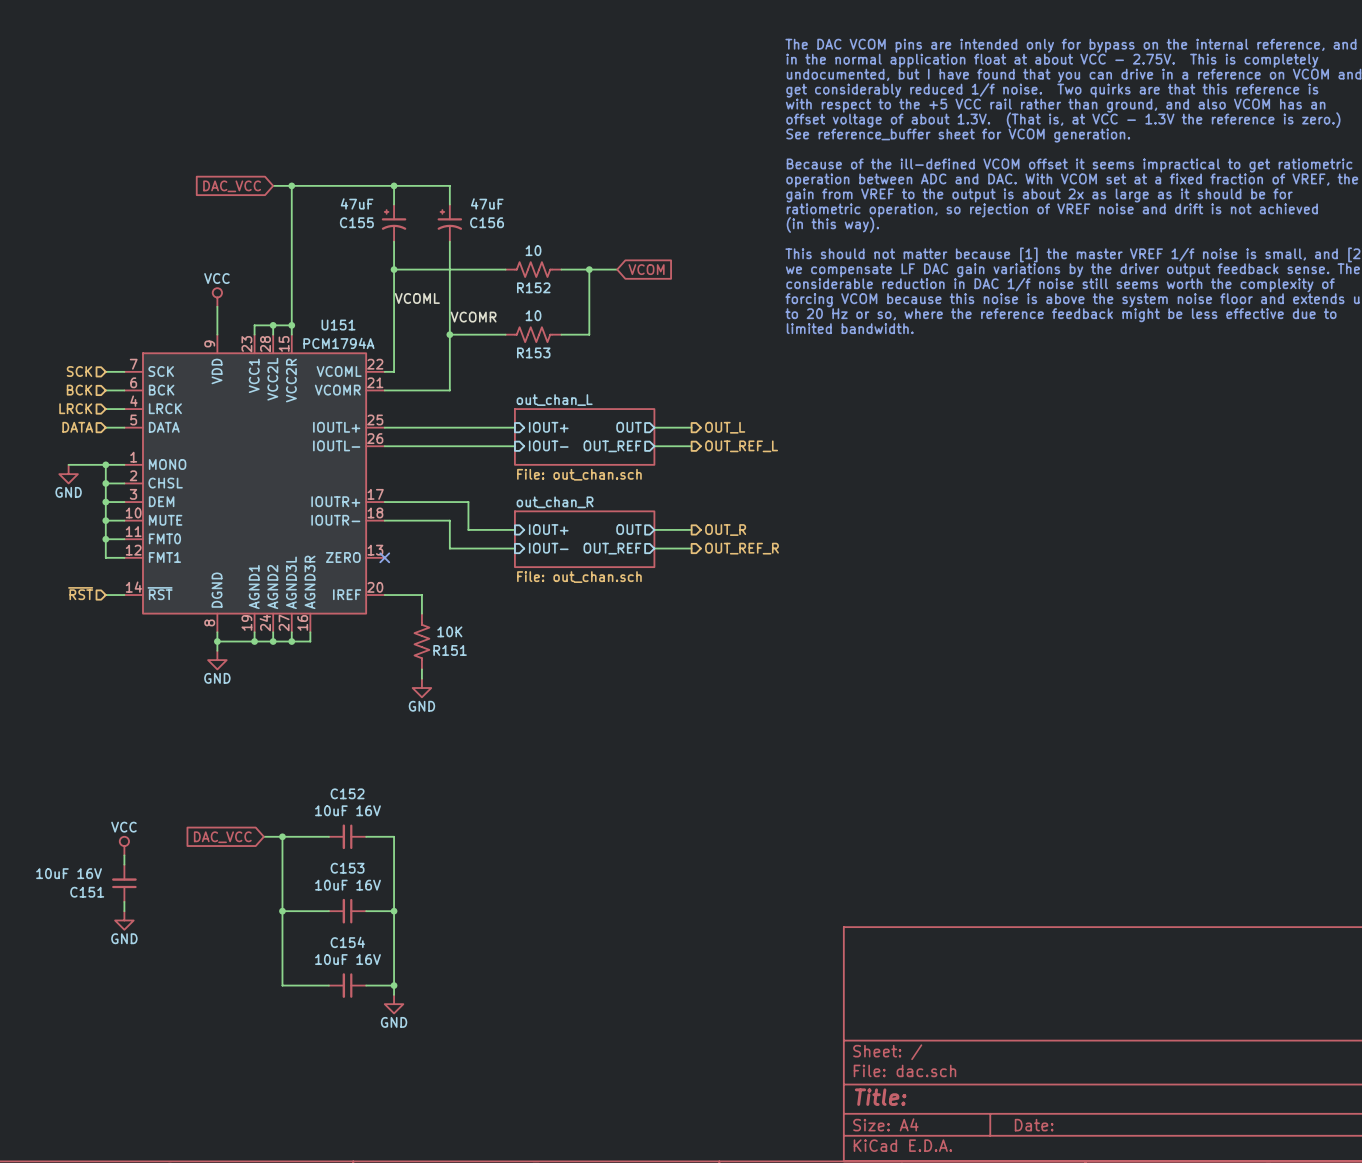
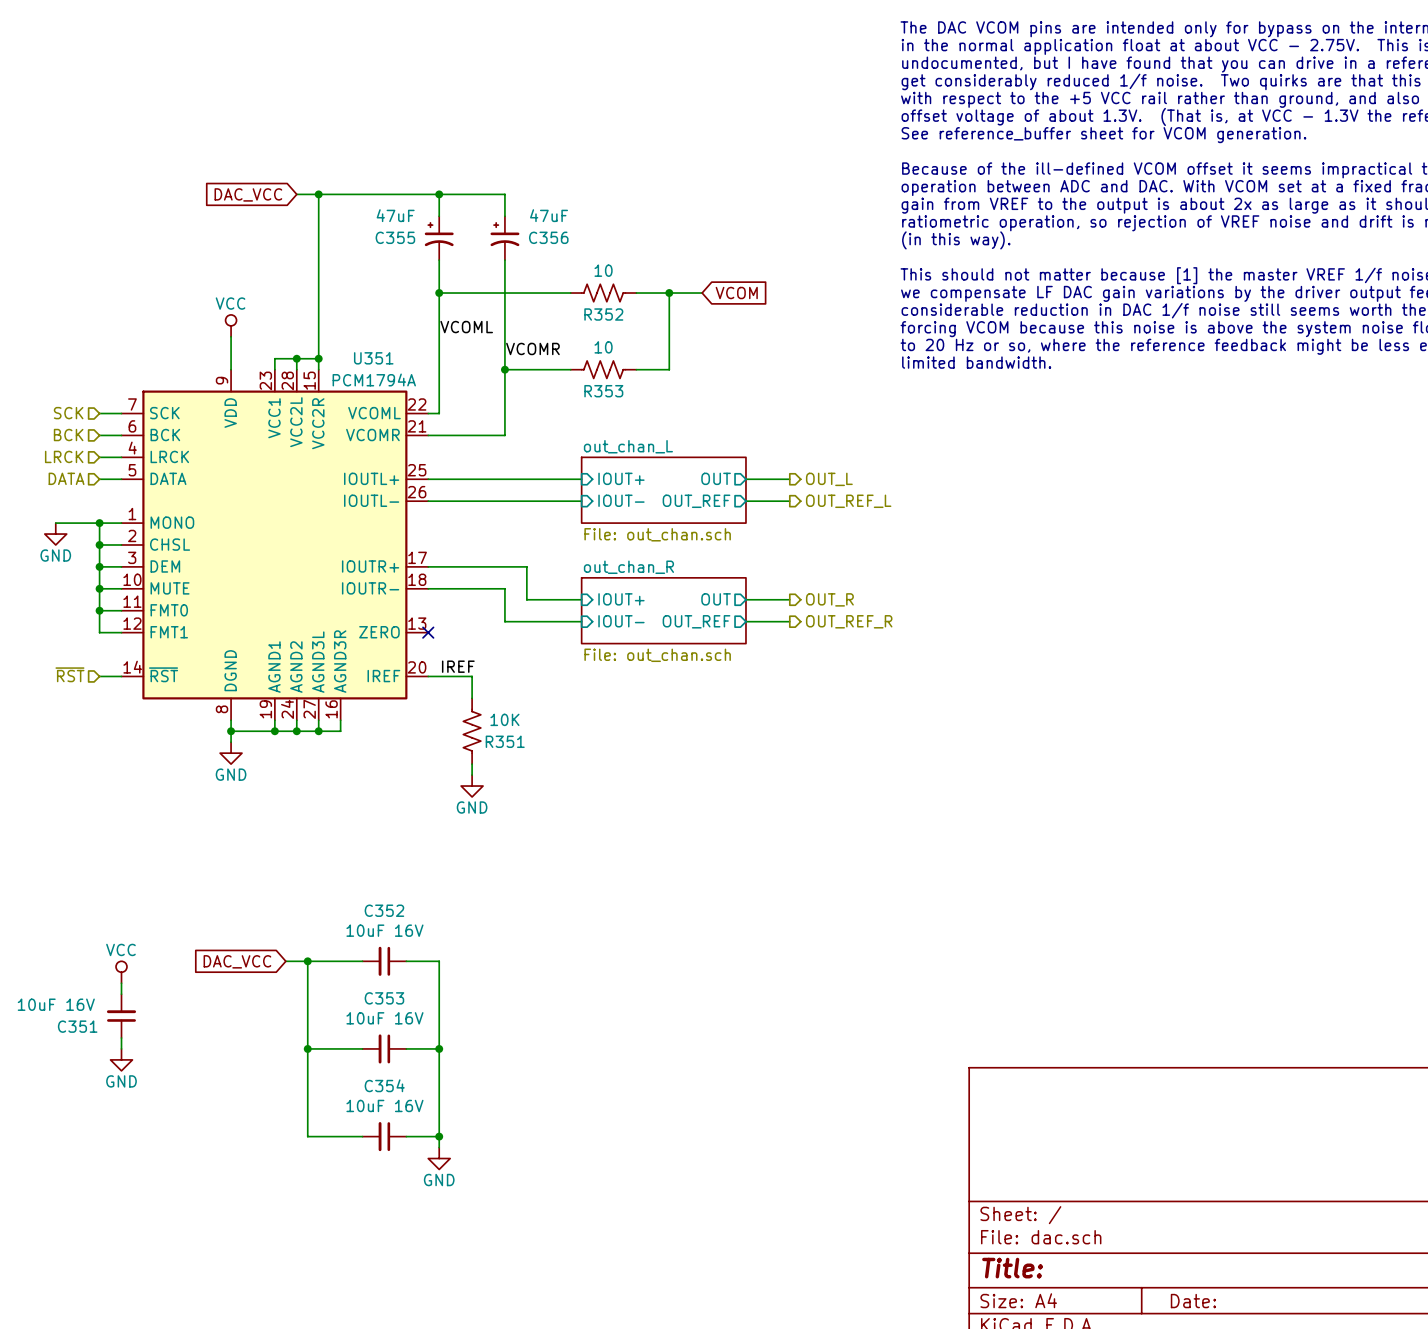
C155 name: C155 (356, 222) -> C355 (395, 237)
C156 name: C156 (487, 222) -> C356 (548, 237)
R152 name: R152 (533, 287) -> R352 (603, 314)
U151 name: U151 (338, 325) -> U351 (373, 358)
R153 name: R153 (533, 352) -> R353 (603, 391)
label: none -> IREF (458, 666)
R151 name: R151 (450, 650) -> R351 (505, 741)
C152 name: C152 (347, 793) -> C352 (384, 910)
C153 name: C153 (347, 868) -> C353 (384, 998)
C151 name: C151 (87, 892) -> C351 (77, 1026)
C154 name: C154 (347, 942) -> C354 (384, 1085)

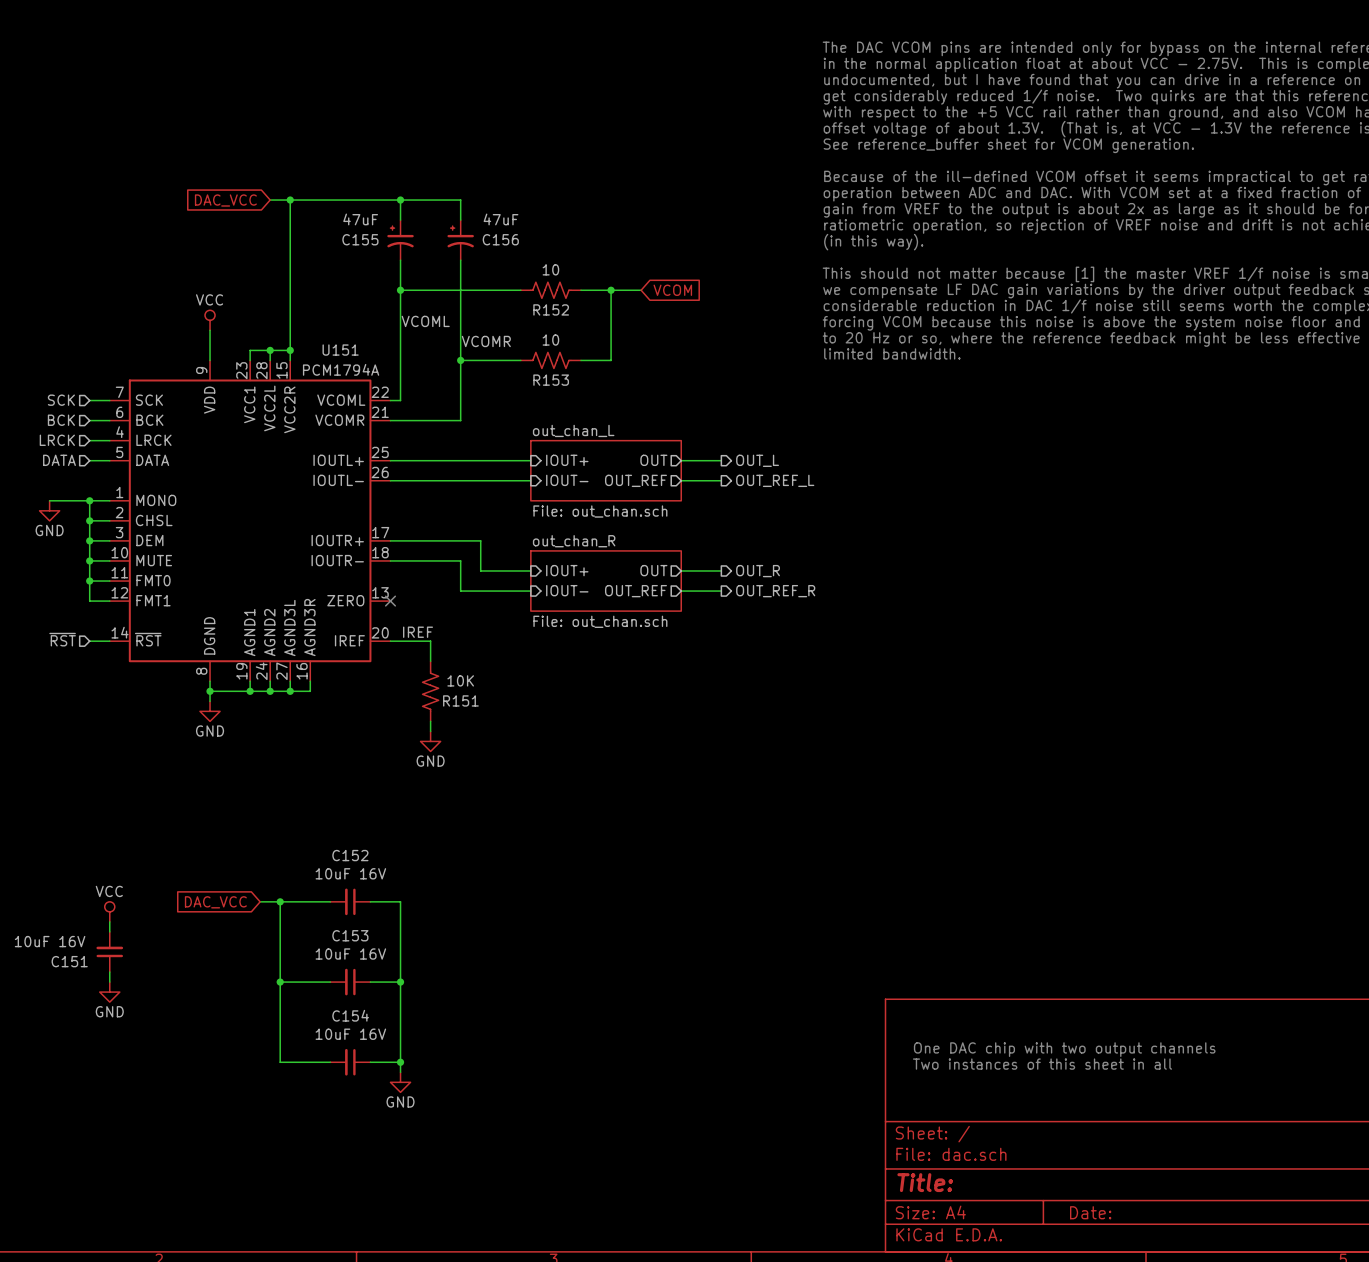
C355 name: C355 (395, 237) -> C155 (360, 239)
C356 name: C356 (548, 237) -> C156 (500, 239)
R352 name: R352 (603, 314) -> R152 (551, 309)
U351 name: U351 (373, 358) -> U151 (340, 350)
R353 name: R353 (603, 391) -> R153 (551, 380)
R351 name: R351 (505, 741) -> R151 (460, 700)
C352 name: C352 (384, 910) -> C152 (350, 855)
C353 name: C353 (384, 998) -> C153 (350, 935)
C351 name: C351 (77, 1026) -> C151 (69, 961)
C354 name: C354 (384, 1085) -> C154 (350, 1015)
text: none -> One DAC chip with two output channels (1064, 1049)
text: none -> Two instances of this sheet in all (1042, 1064)

